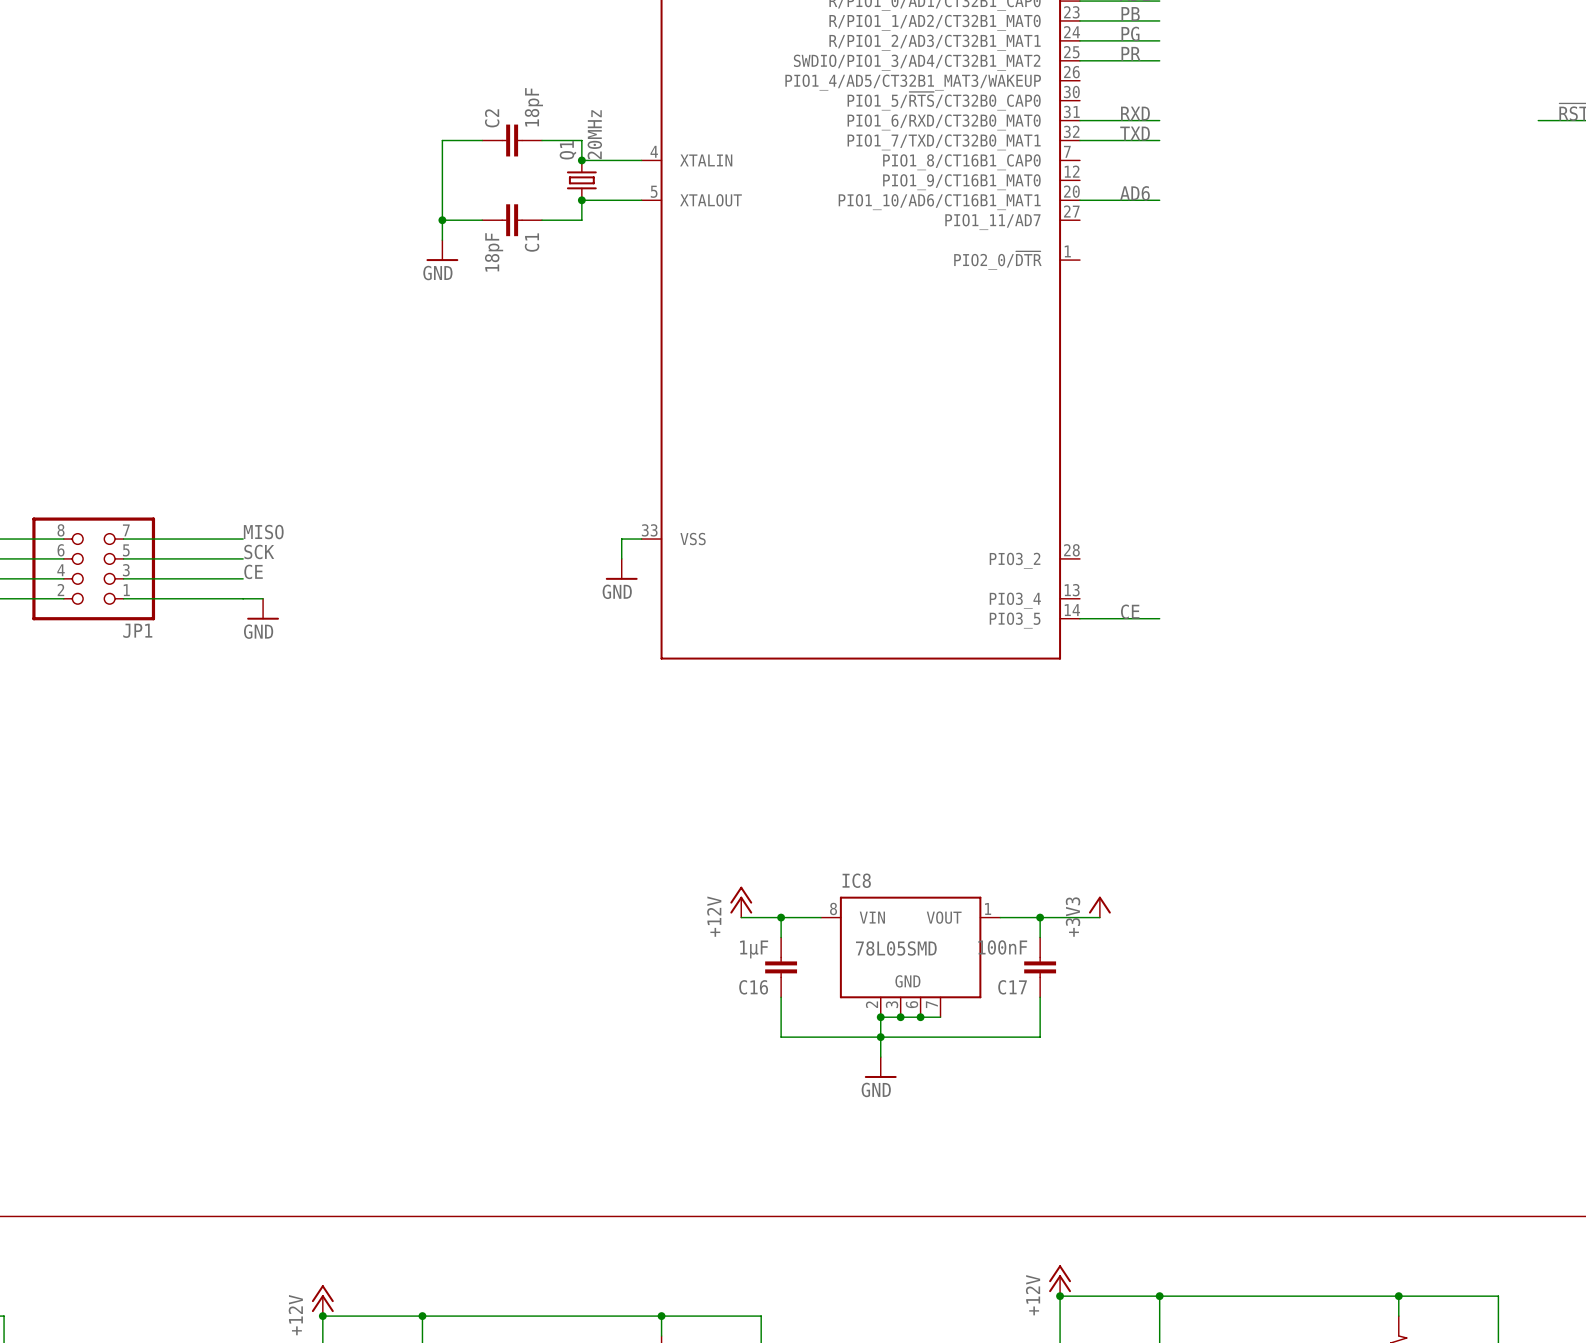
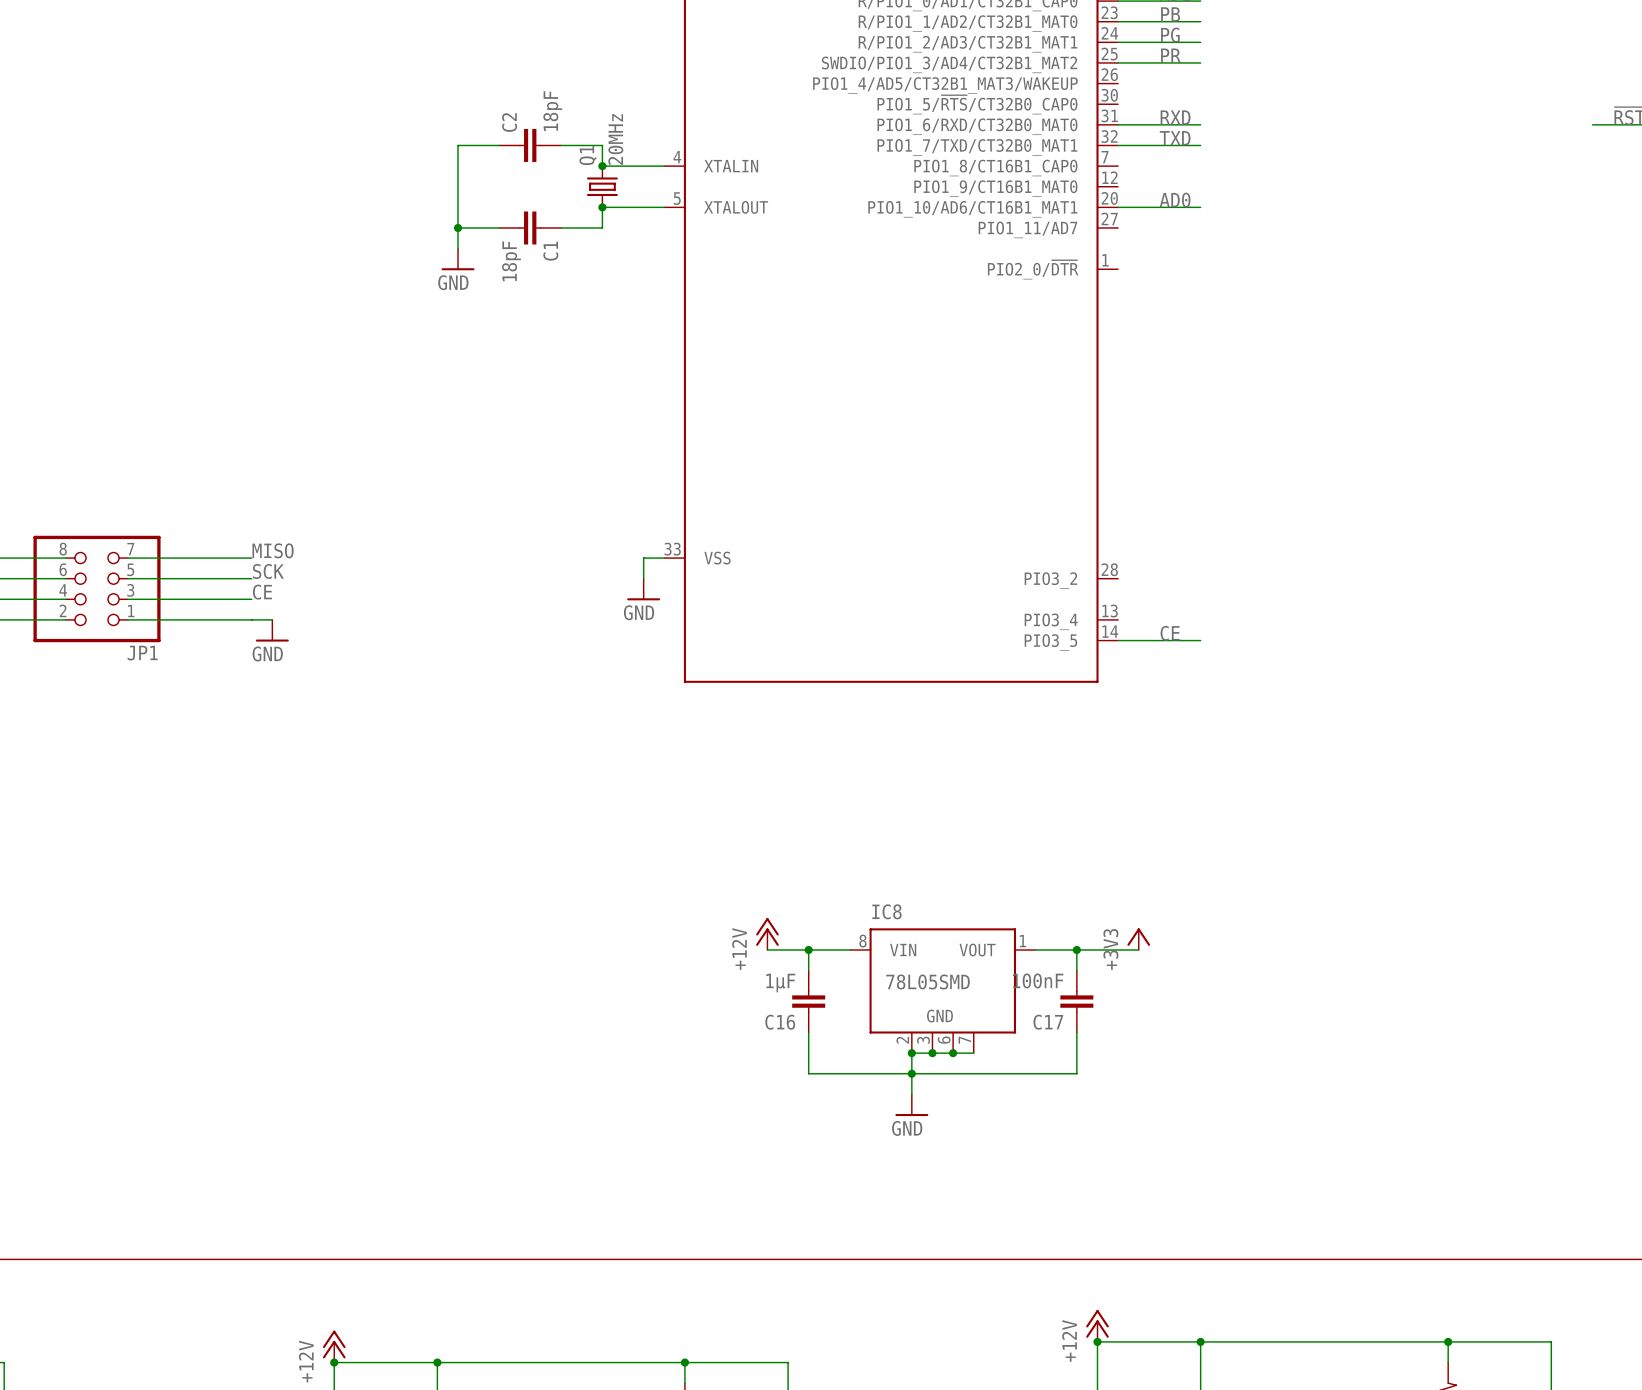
label: AD6 (1134, 193) -> AD0 (1175, 200)

